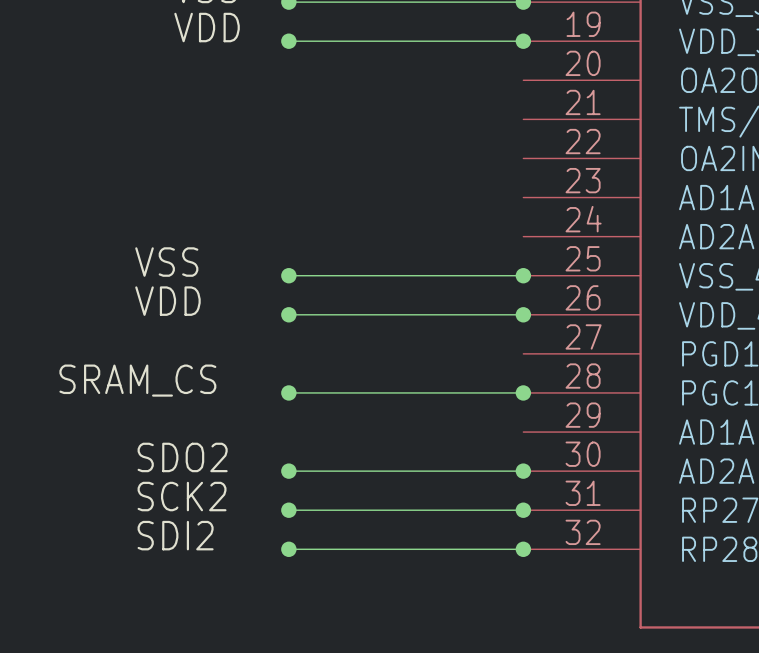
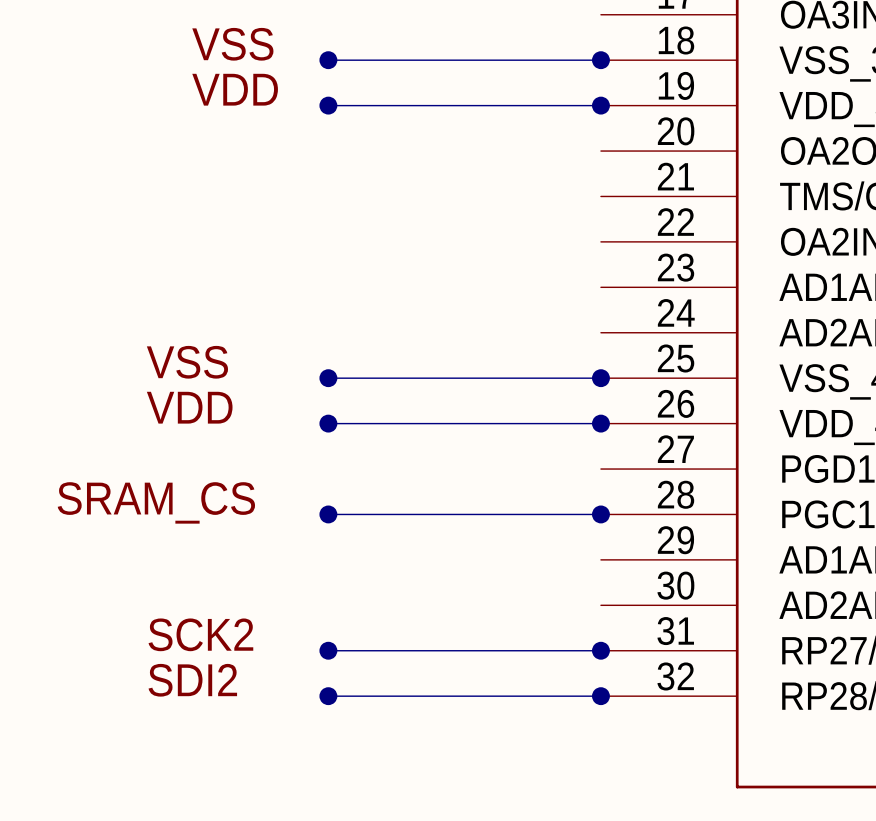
label: SDO2 (182, 457) -> none
wire: (288, 471) (523, 471) -> none
junction: (288, 471) -> none
junction: (523, 471) -> none

